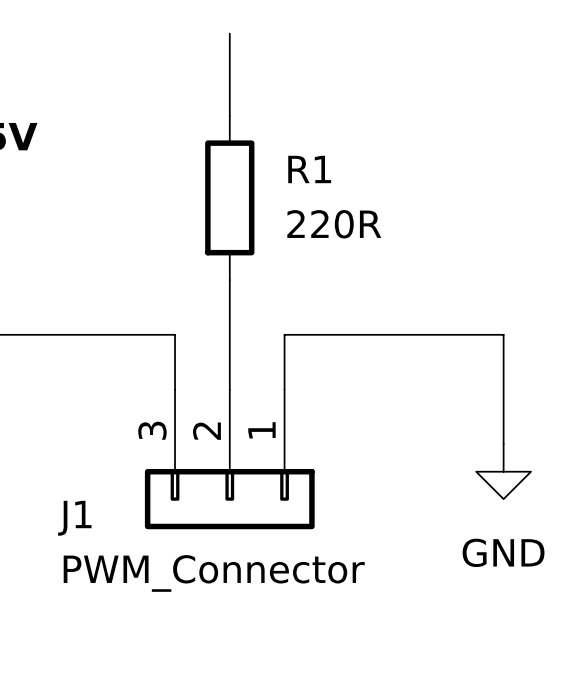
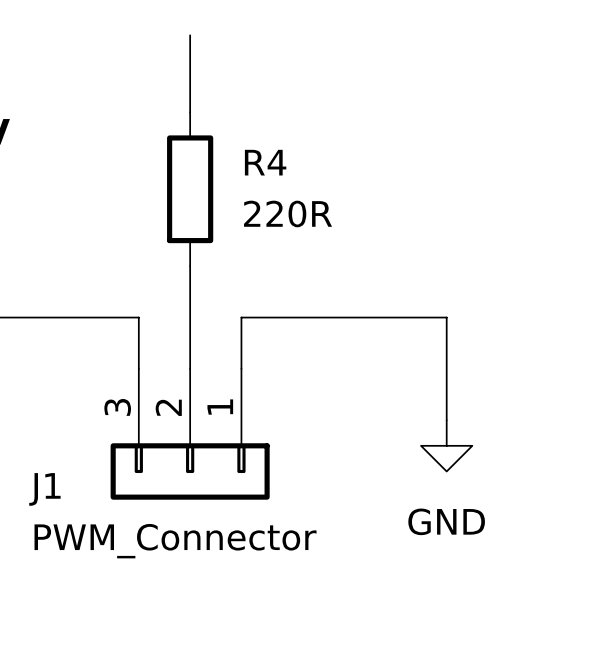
R1 name: R1 (309, 169) -> R4 (265, 162)

